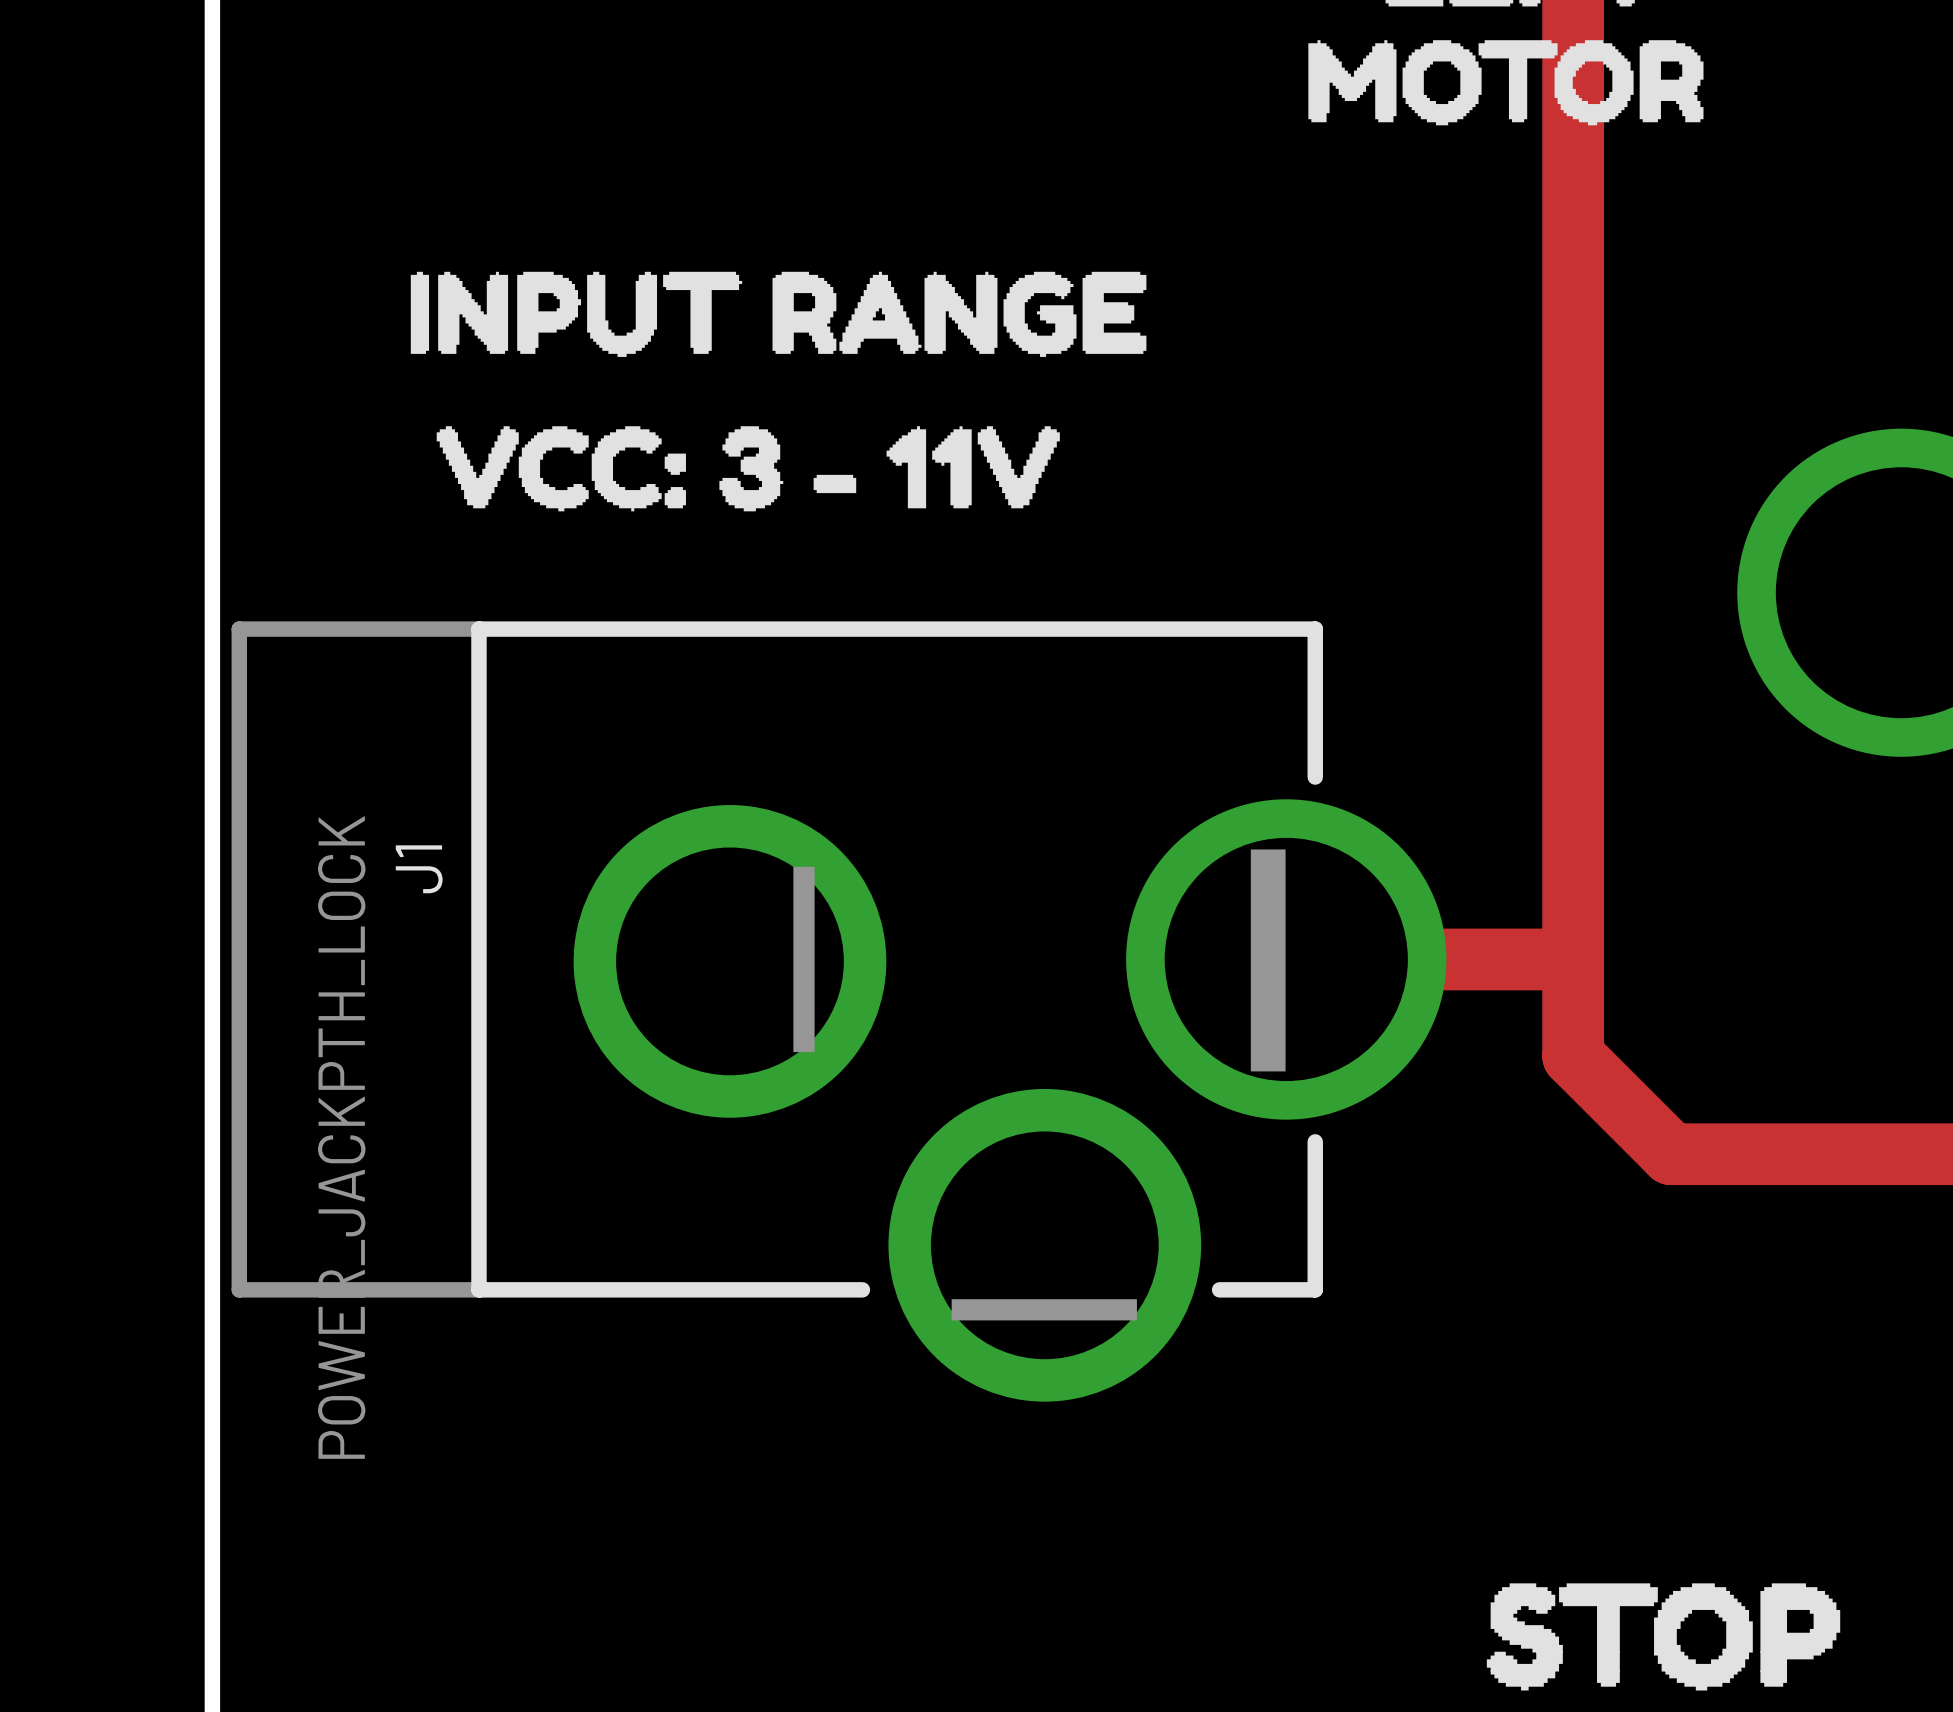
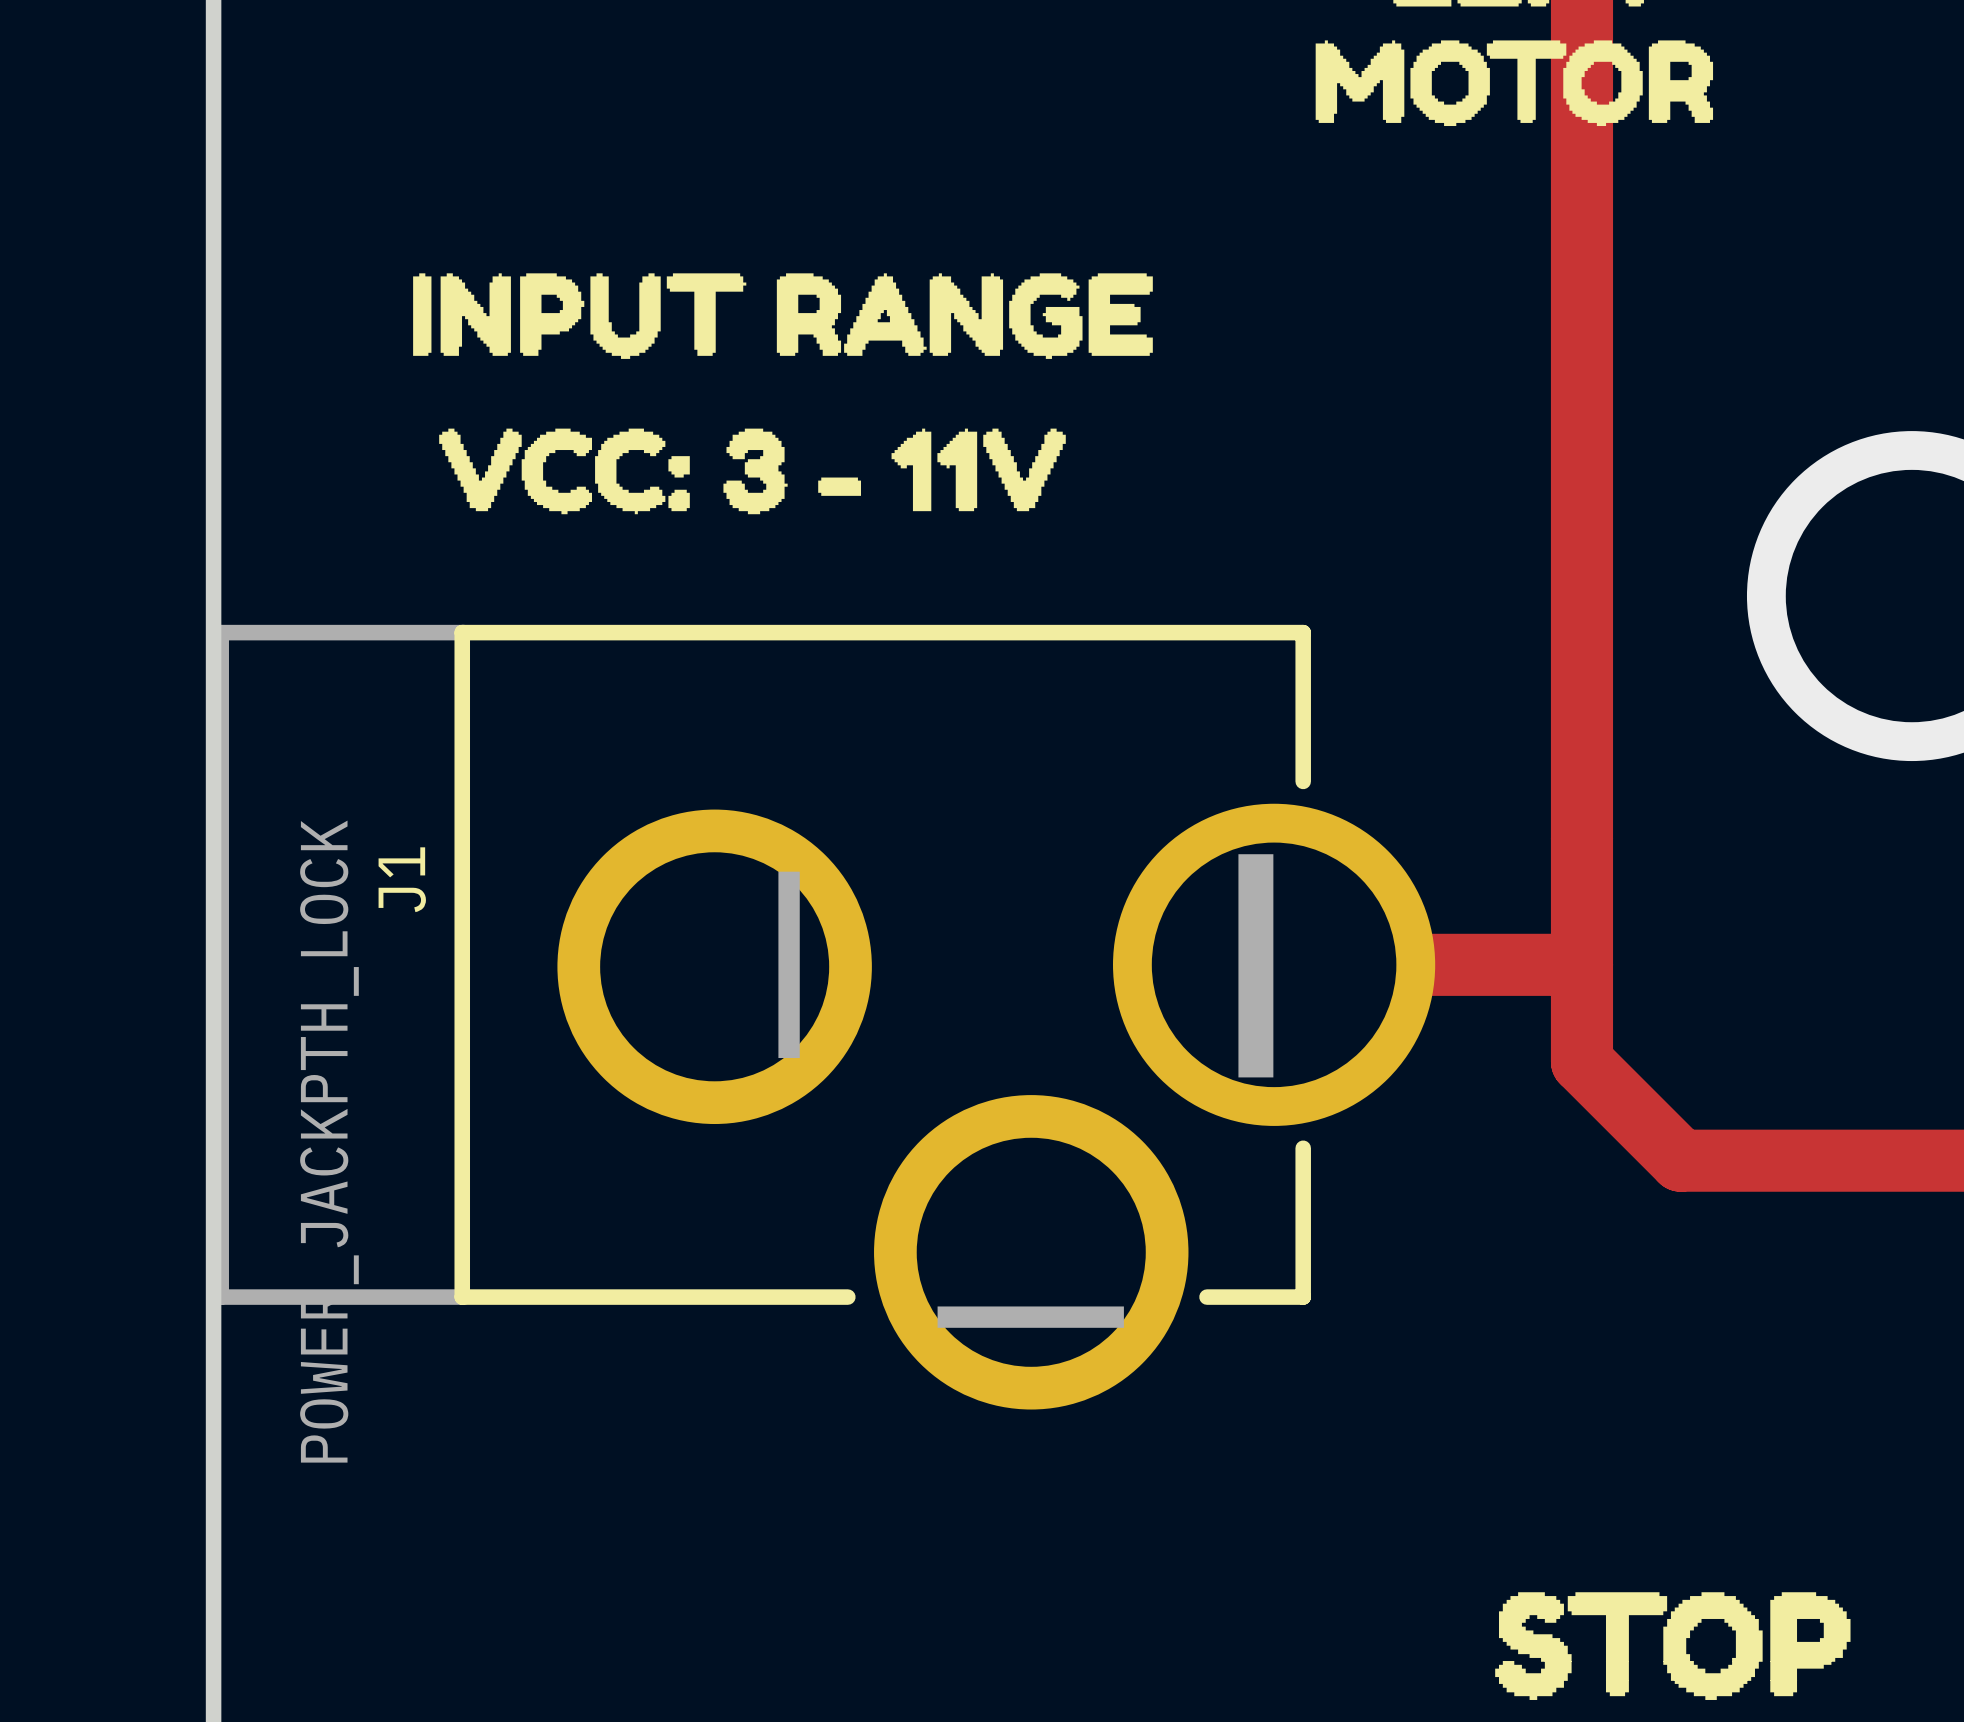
J1 position: (839, 1011) -> (824, 1017)

